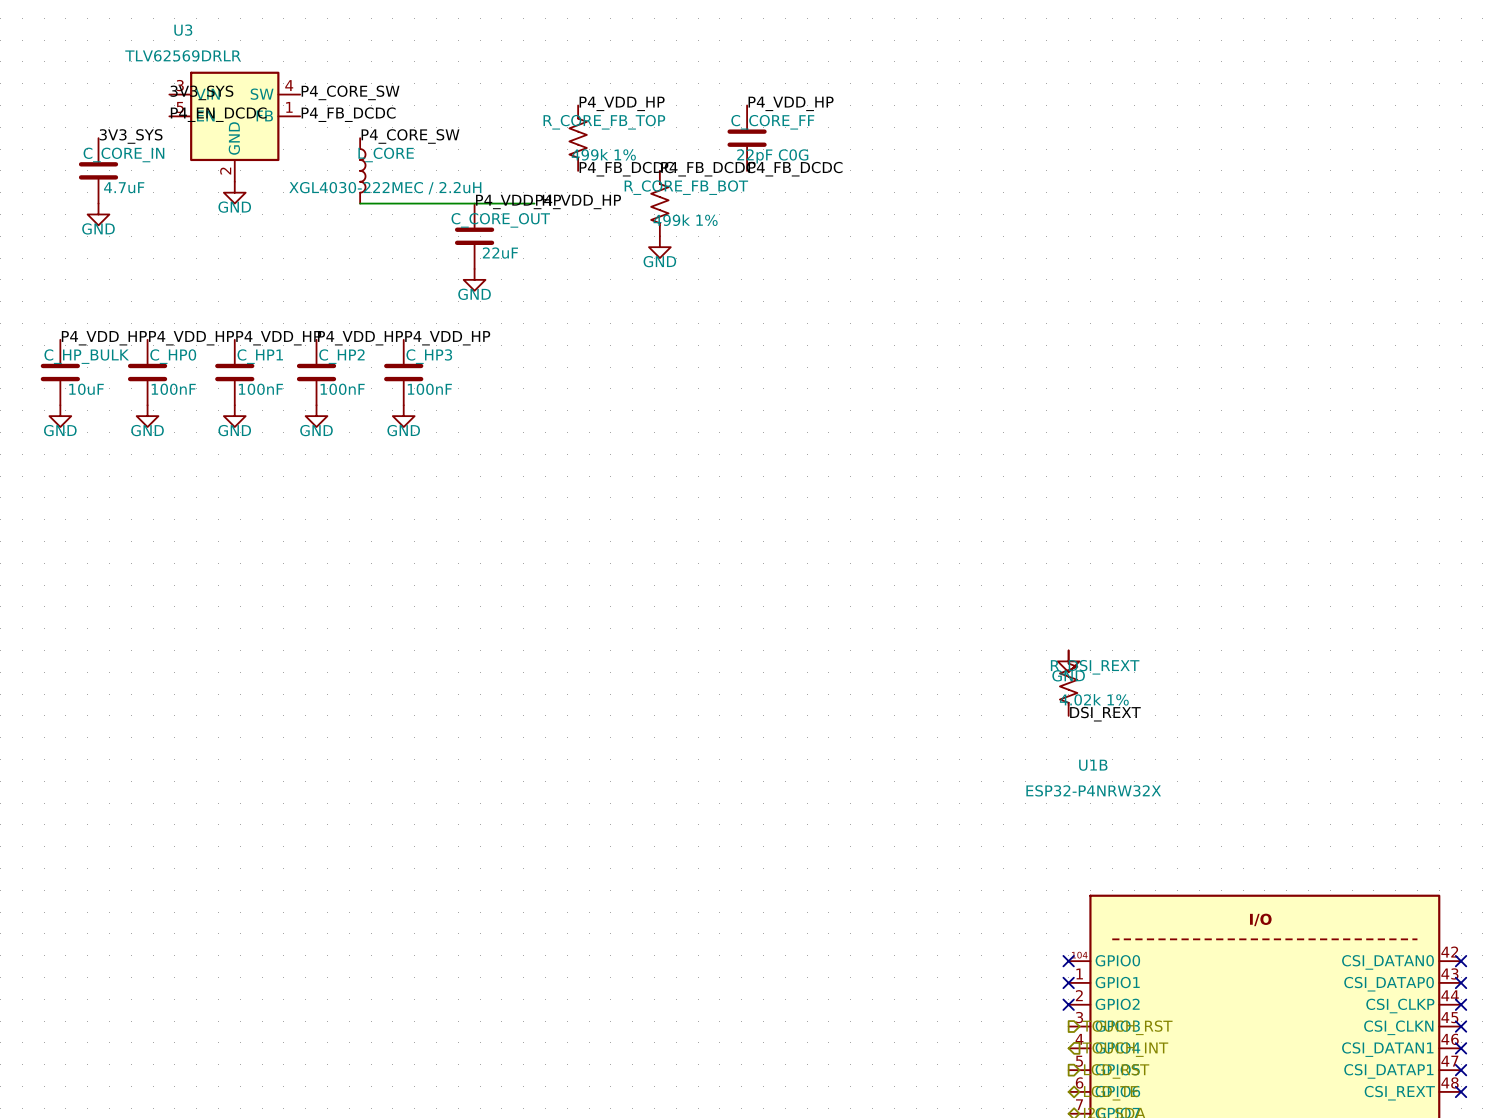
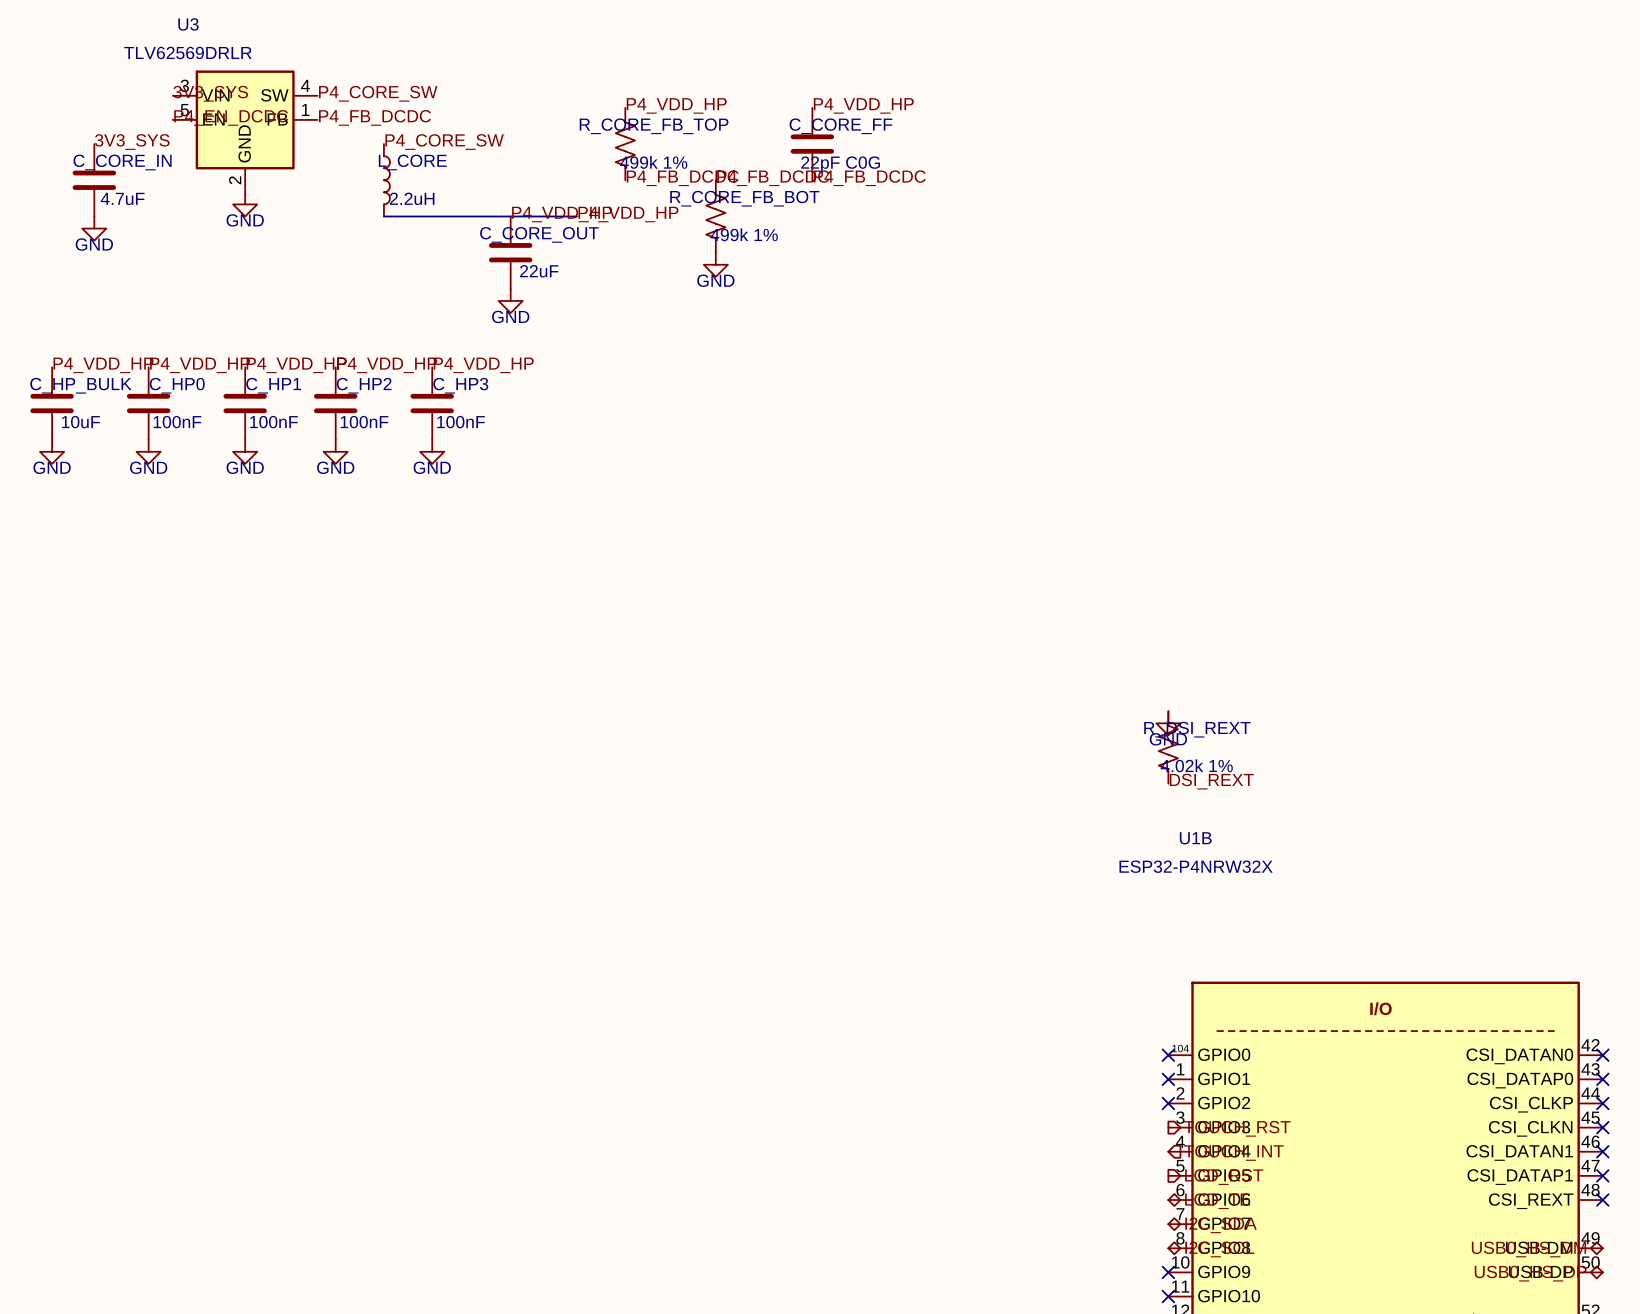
L_CORE value: XGL4030-222MEC / 2.2uH (385, 188) -> 2.2uH (412, 198)

